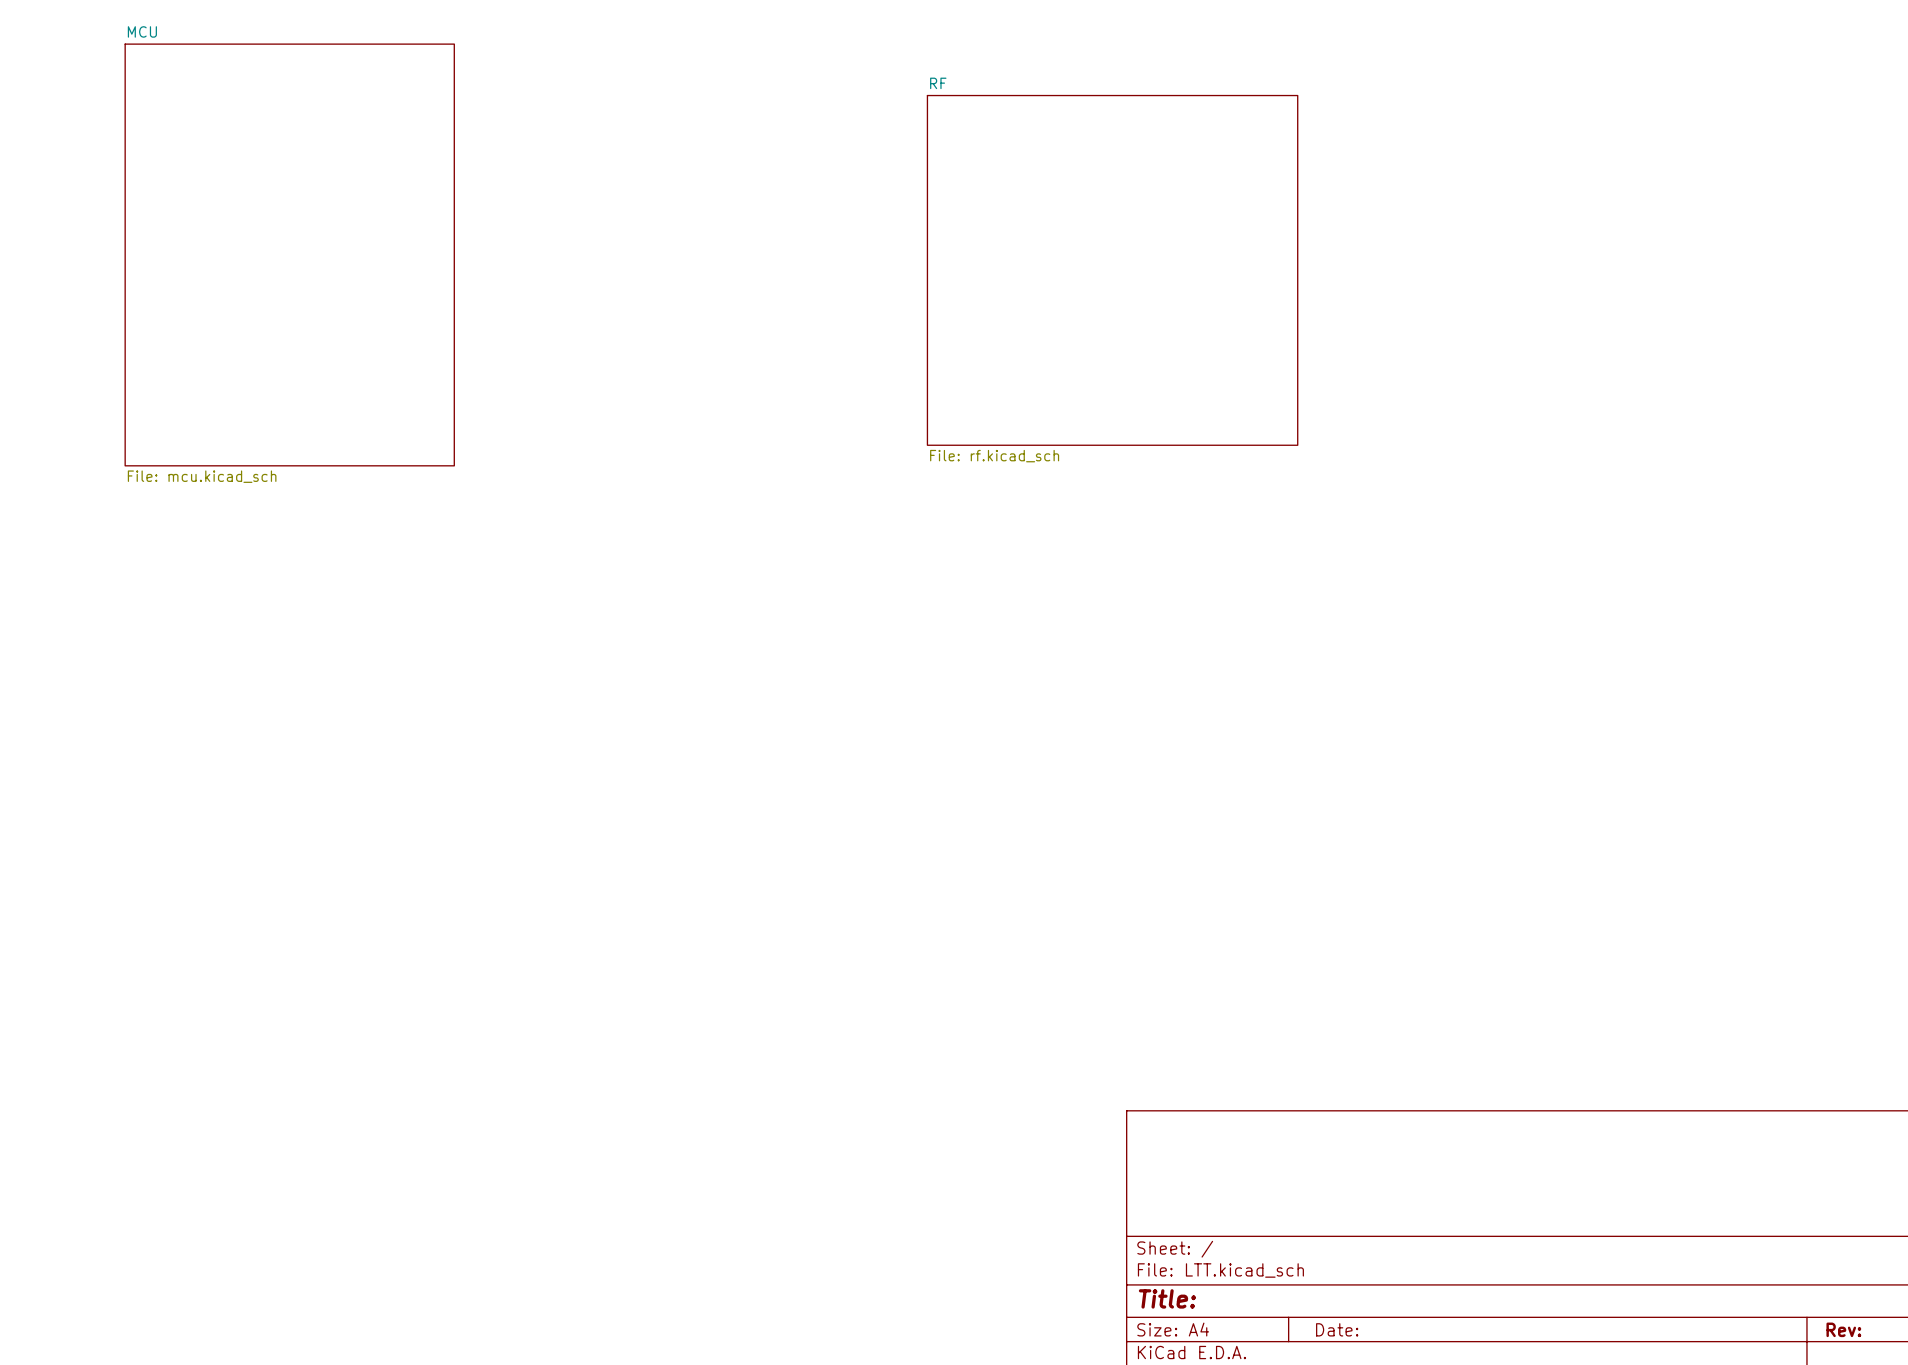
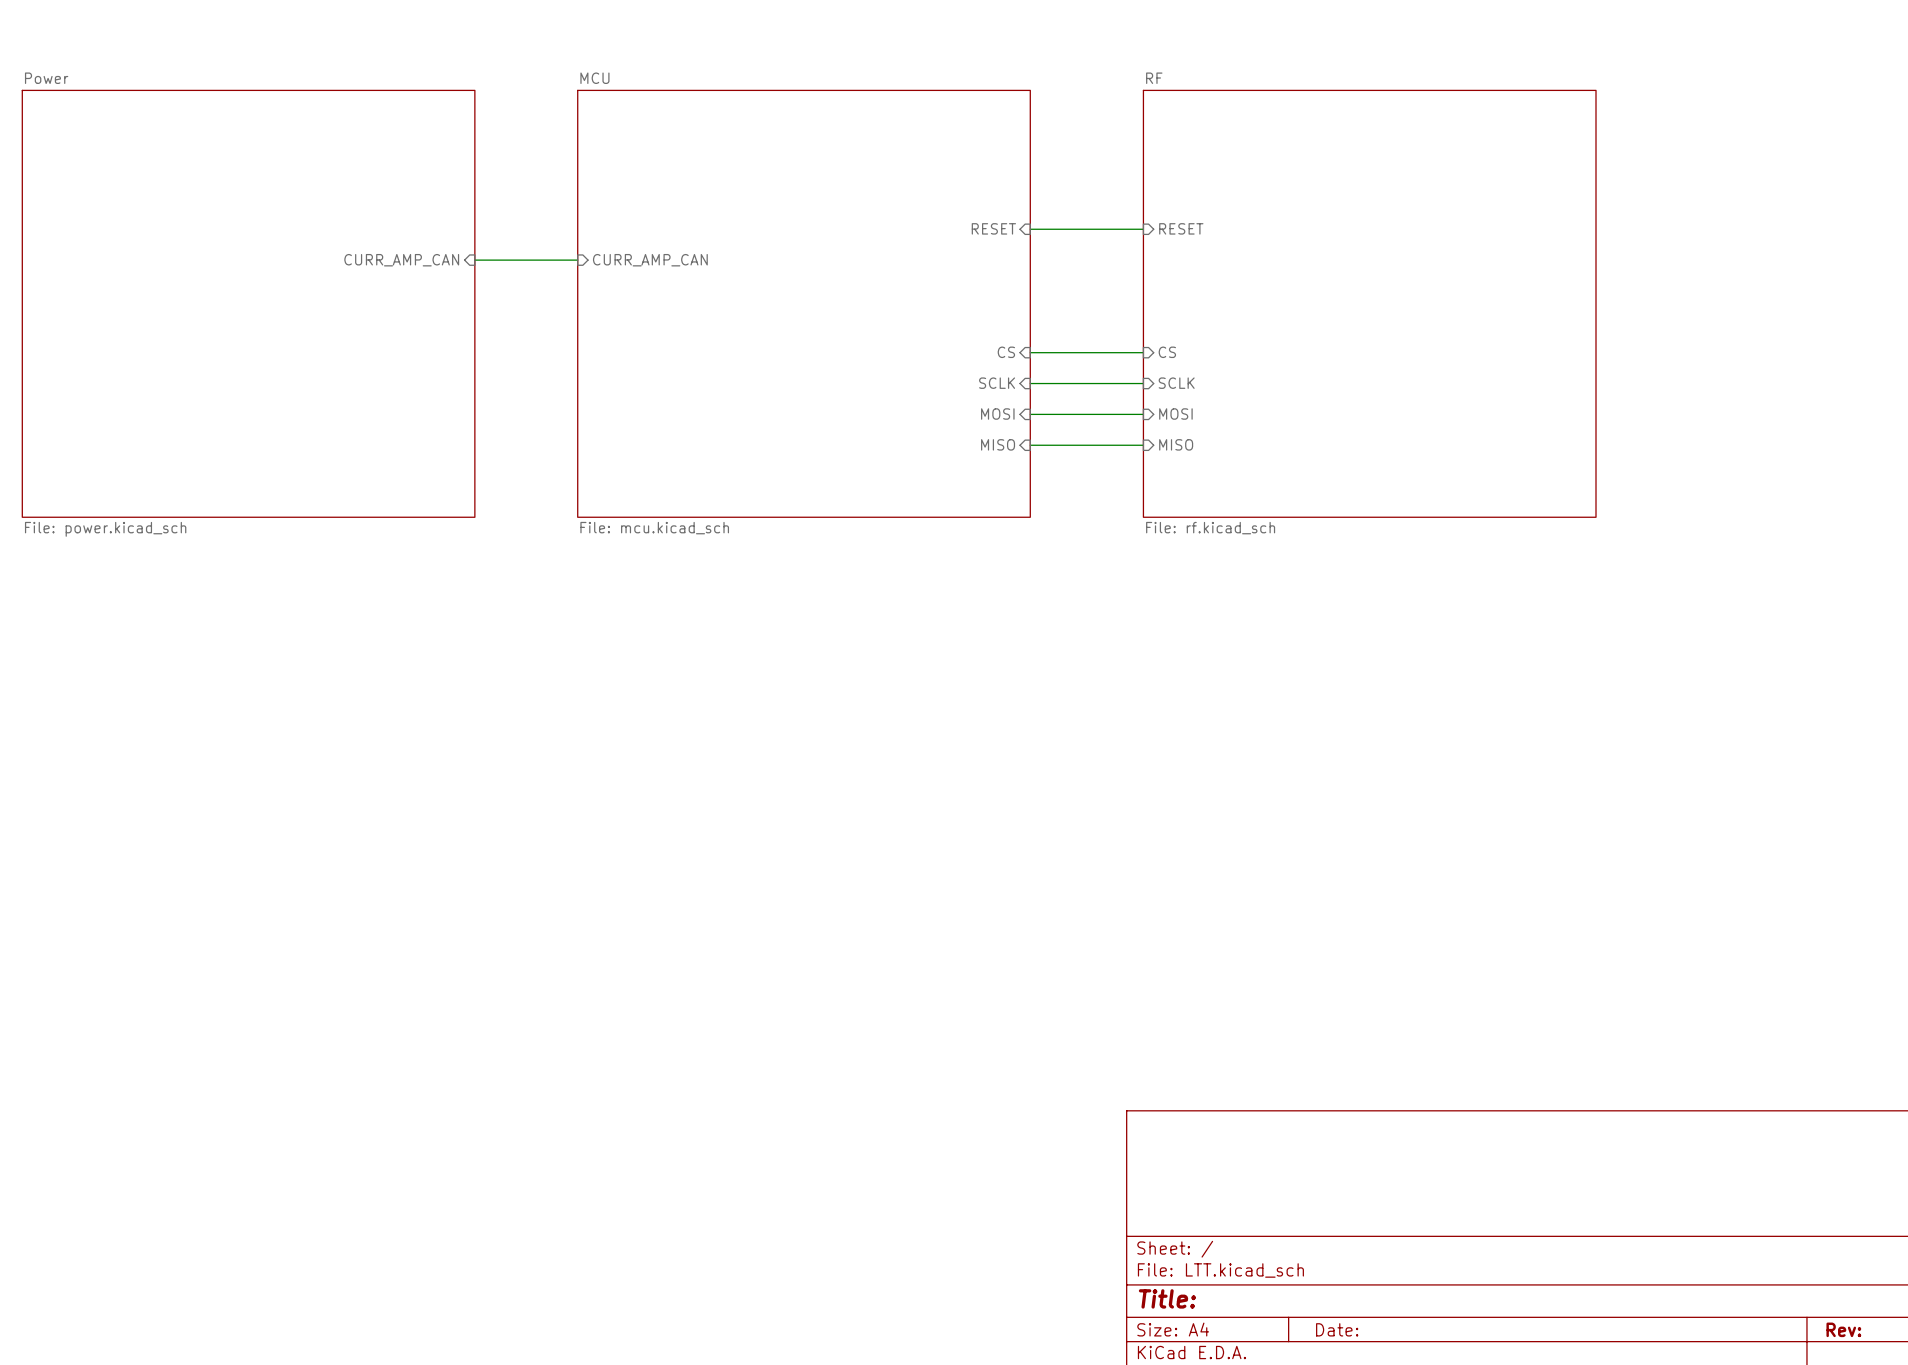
sheet pin: none -> RESET (993, 228)
sheet pin: none -> RESET (1181, 228)
wire: none -> (1030, 229) (1143, 229)
sheet MCU: File: mcu.kicad_sch (289, 254) -> none
sheet pin: none -> CURR_AMP_CAN (401, 260)
wire: none -> (474, 260) (577, 260)
sheet pin: none -> CURR_AMP_CAN (650, 260)
sheet RF: File: rf.kicad_sch (1112, 270) -> none
sheet Power: none -> File: power.kicad_sch (248, 303)
sheet MCU: none -> File: mcu.kicad_sch (804, 303)
sheet RF: none -> File: rf.kicad_sch (1369, 303)
sheet pin: none -> CS (1006, 352)
wire: none -> (1030, 352) (1143, 352)
sheet pin: none -> CS (1167, 352)
sheet pin: none -> SCLK (997, 383)
wire: none -> (1030, 383) (1143, 383)
sheet pin: none -> SCLK (1176, 383)
sheet pin: none -> MOSI (997, 414)
wire: none -> (1030, 414) (1143, 414)
sheet pin: none -> MOSI (1175, 414)
sheet pin: none -> MISO (998, 444)
sheet pin: none -> MISO (1176, 444)

